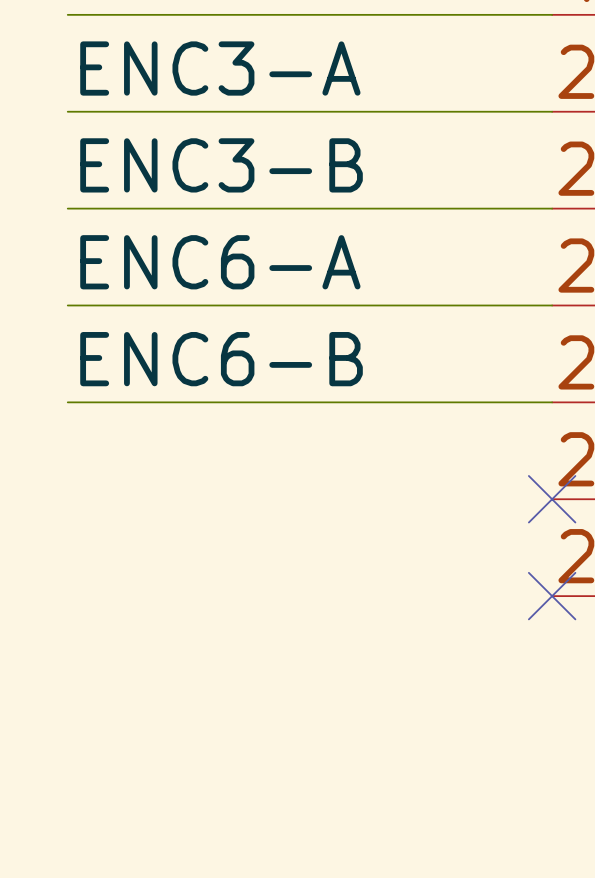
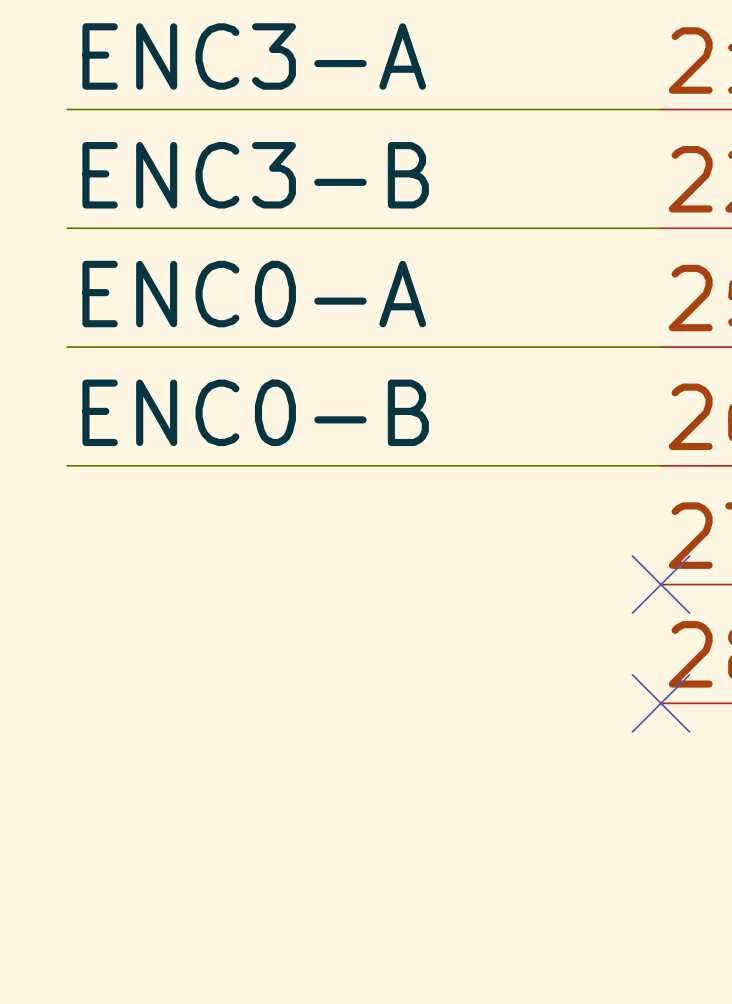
label: ENC6-A (220, 262) -> ENC0-A (254, 294)
label: ENC6-B (221, 359) -> ENC0-B (255, 412)

